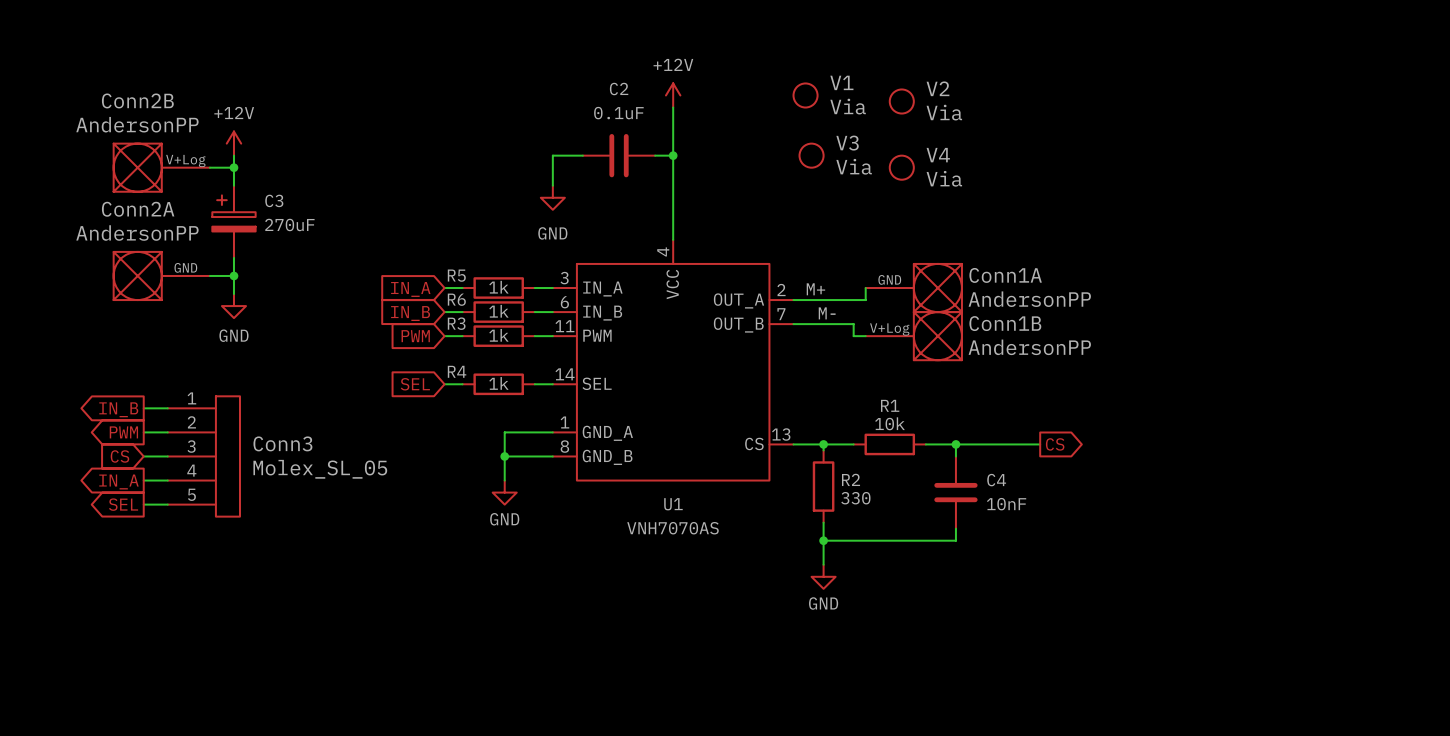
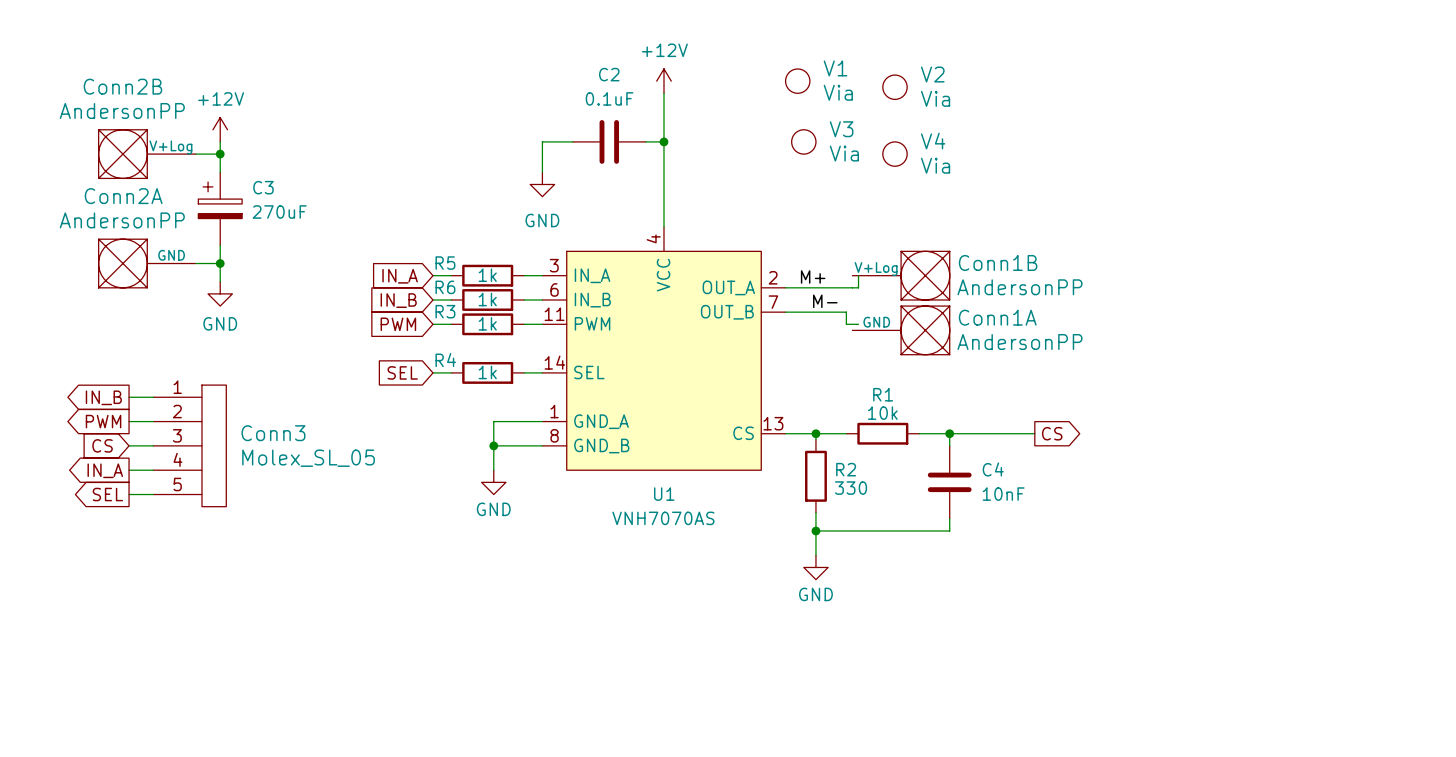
Conn1A position: (913, 288) -> (901, 330)
Conn1B position: (913, 336) -> (901, 275)

